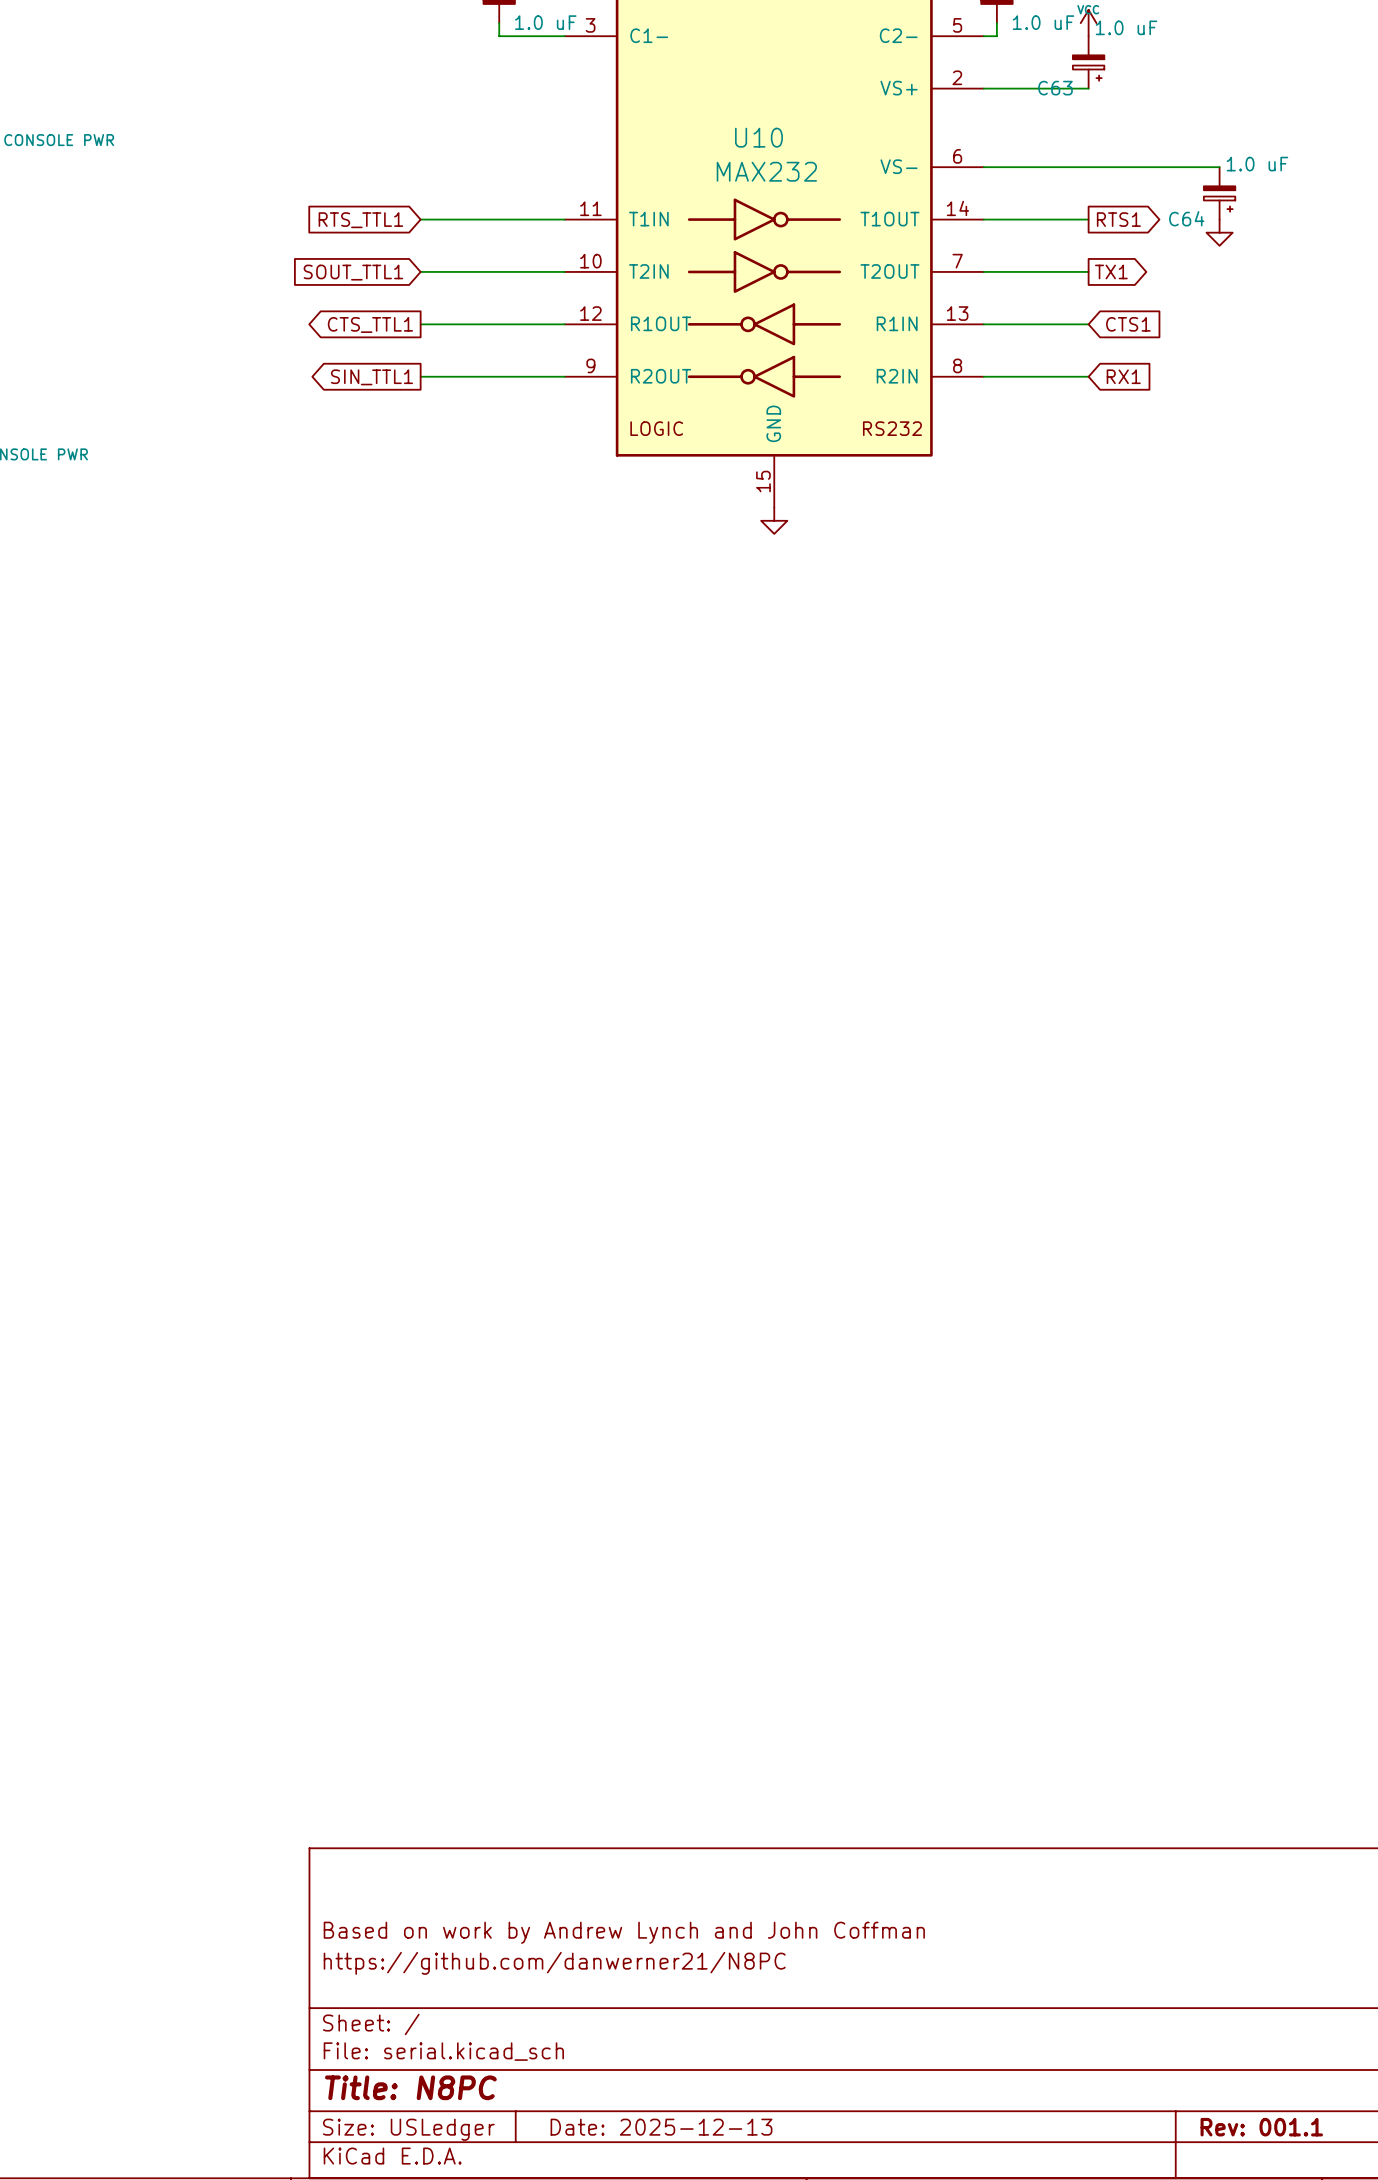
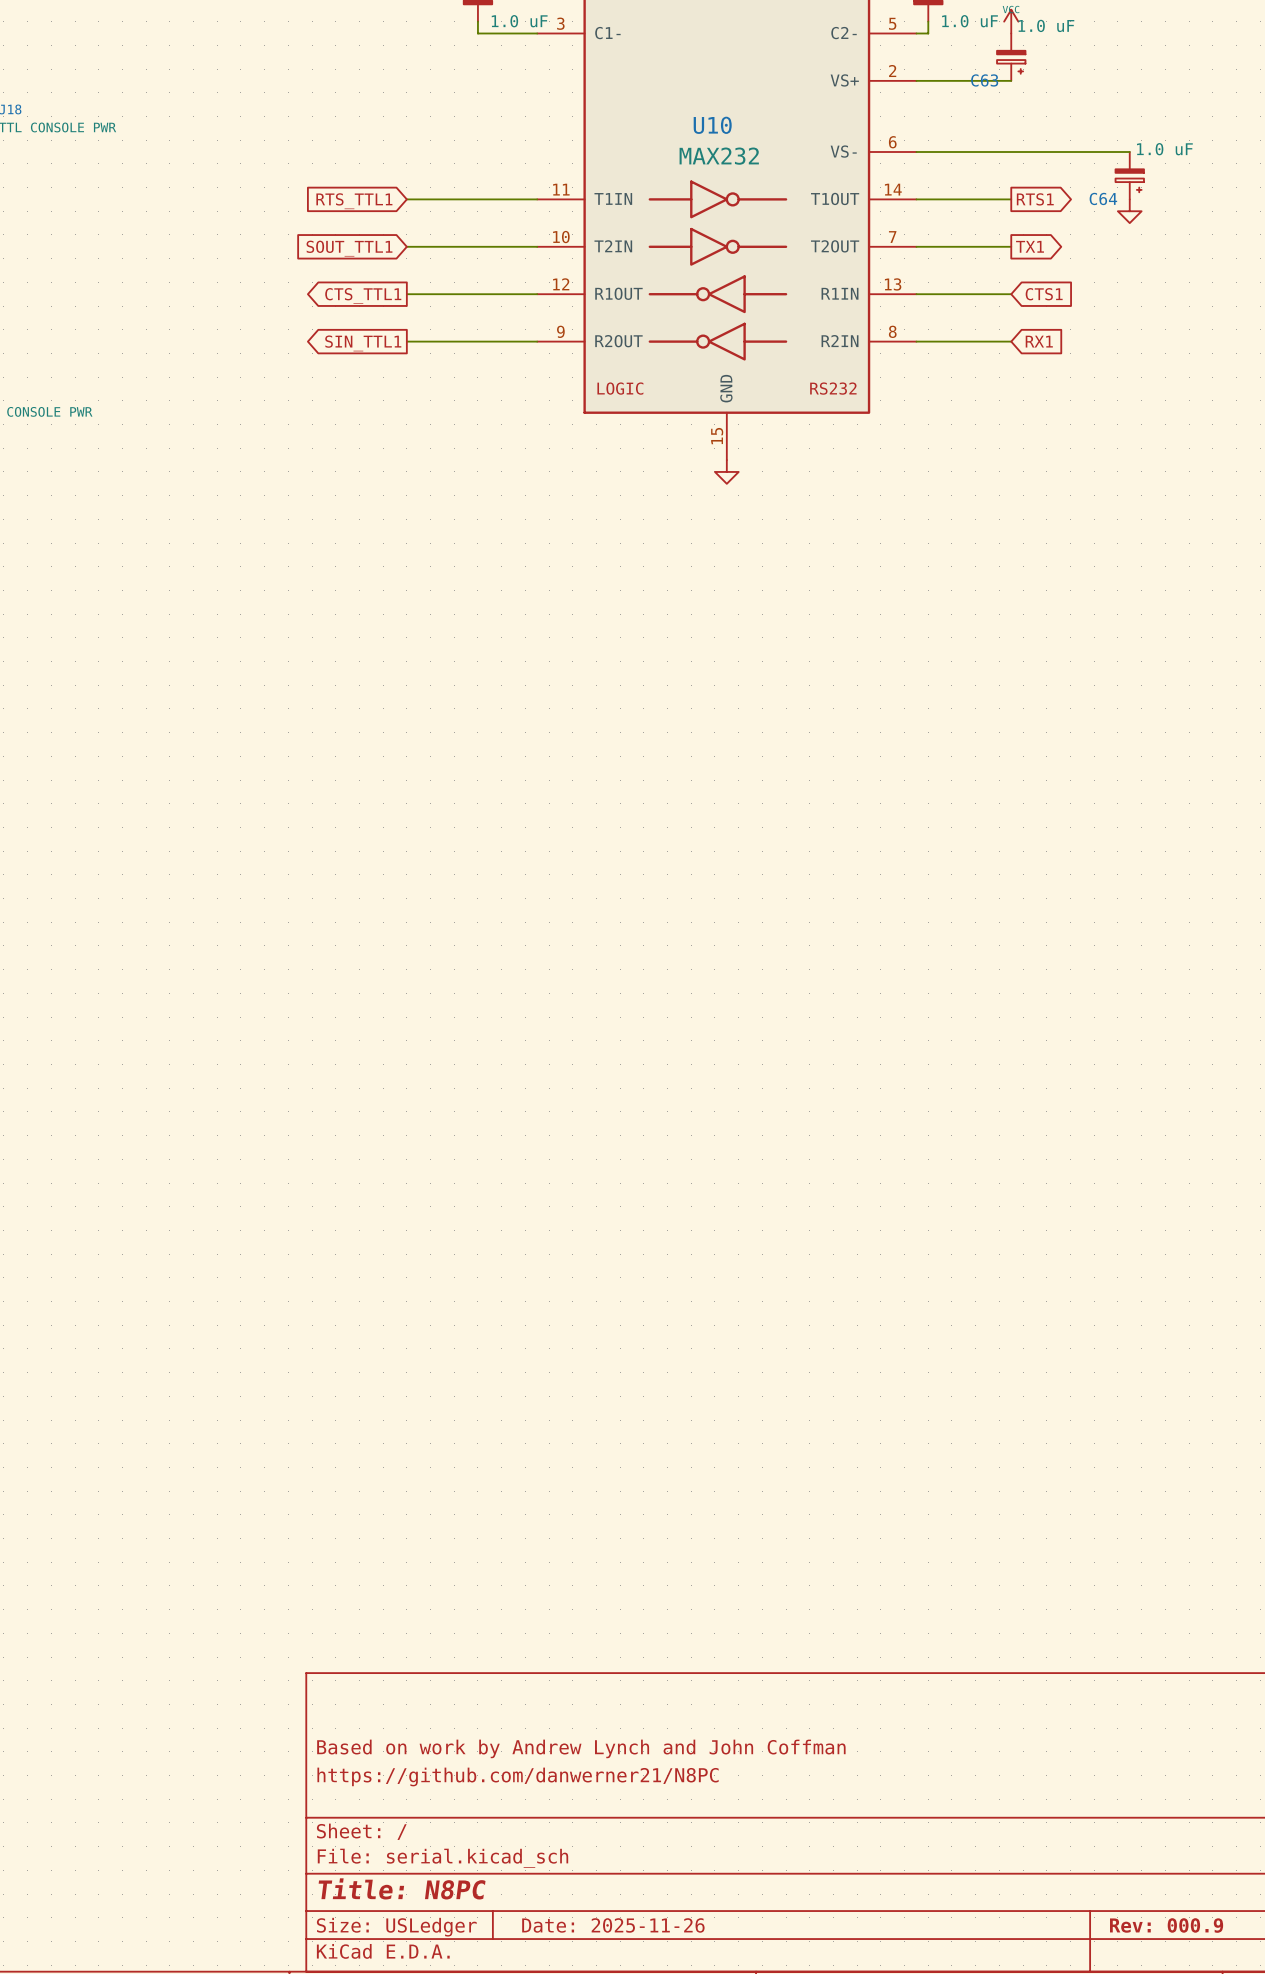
title block: Date: 2025-12-13 (661, 2127) -> Date: 2025-11-26 (613, 1925)
title block: Rev: 001.1 (1261, 2127) -> Rev: 000.9 (1166, 1925)

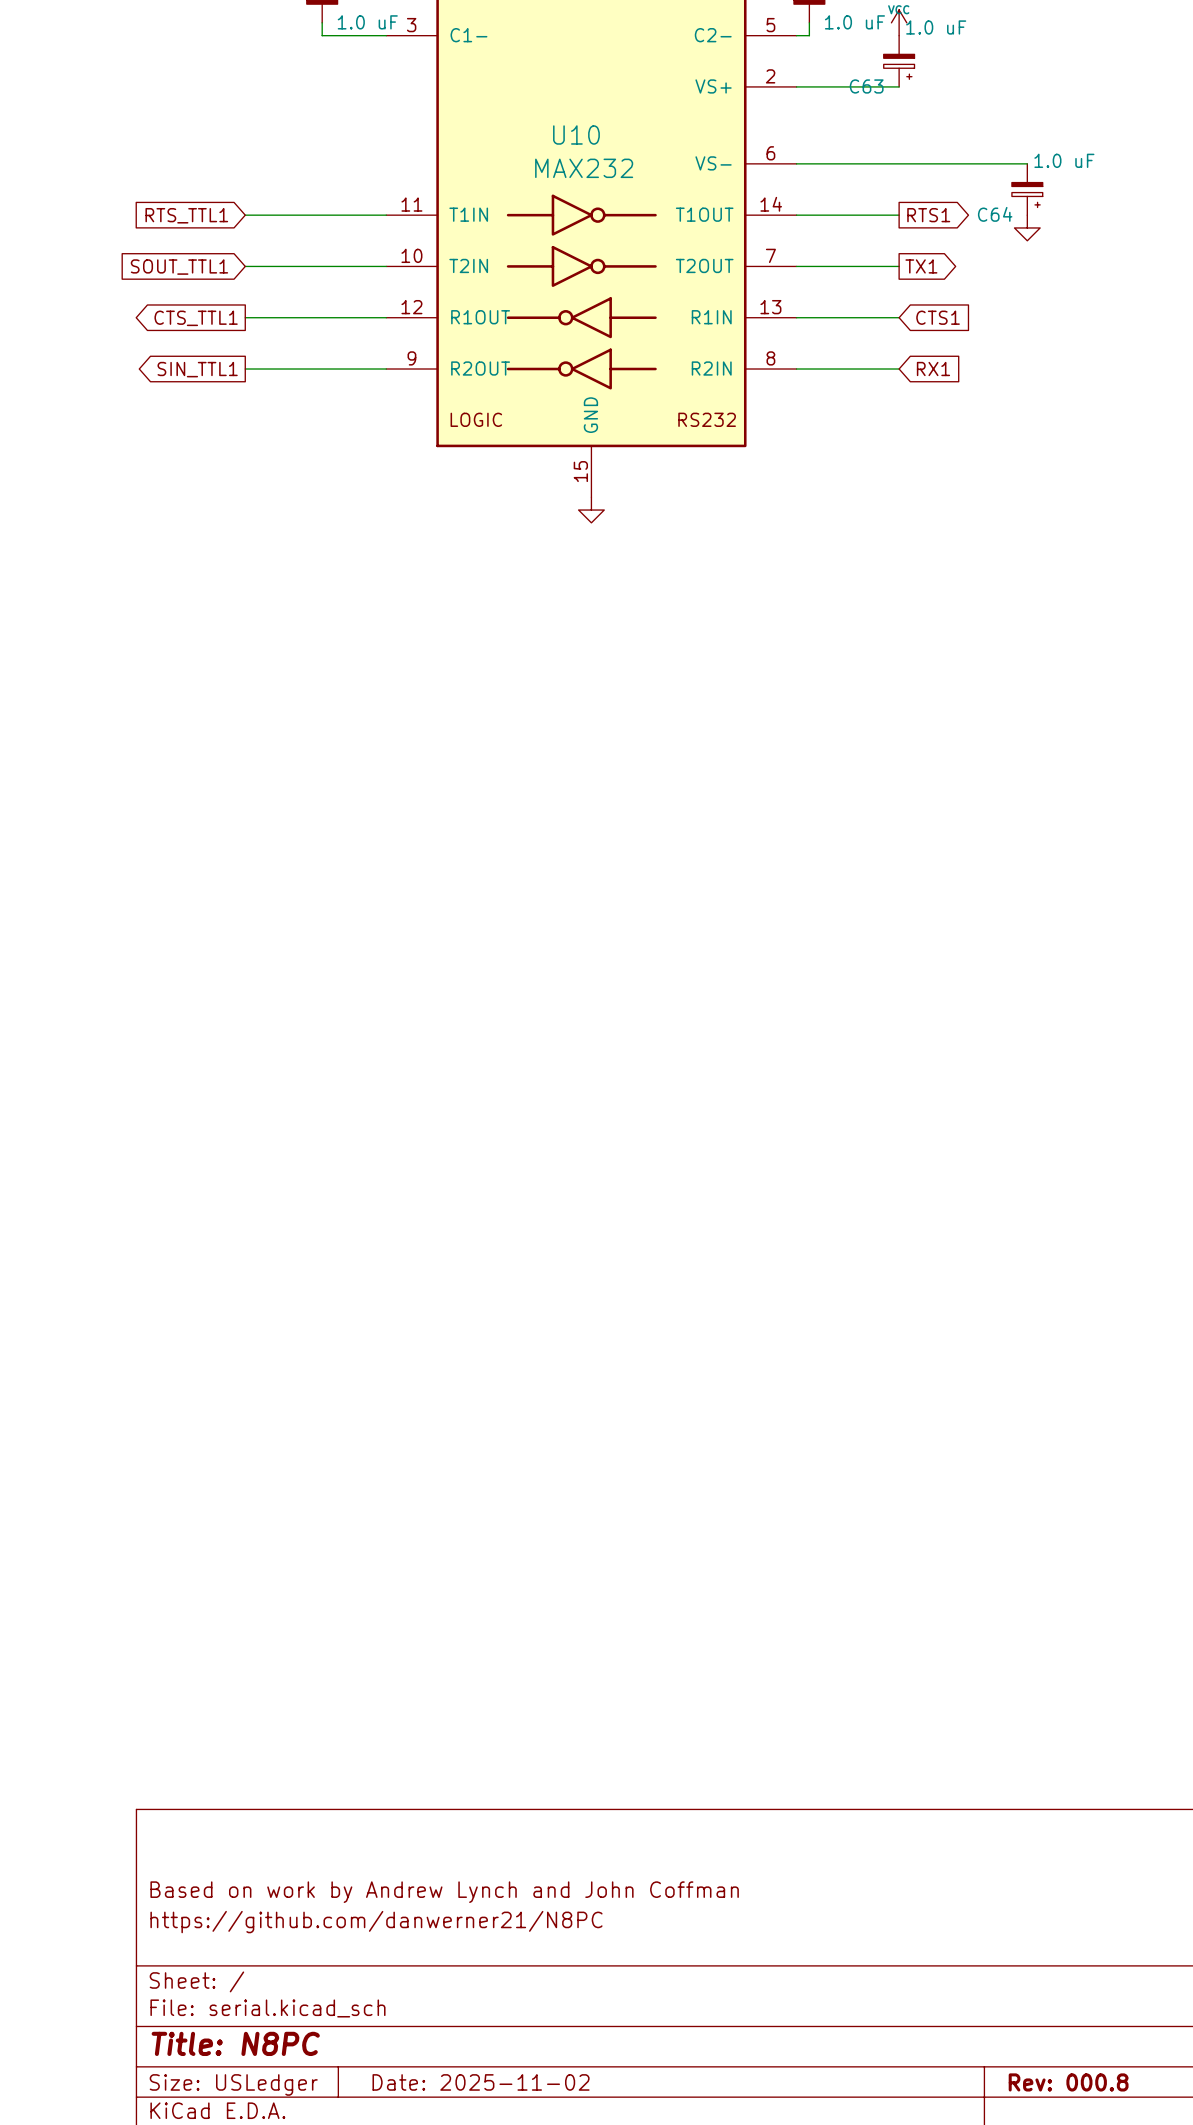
title block: Date: 2025-11-26 (613, 1925) -> Date: 2025-11-02 (481, 2082)
title block: Rev: 000.9 (1166, 1925) -> Rev: 000.8 (1068, 2082)

